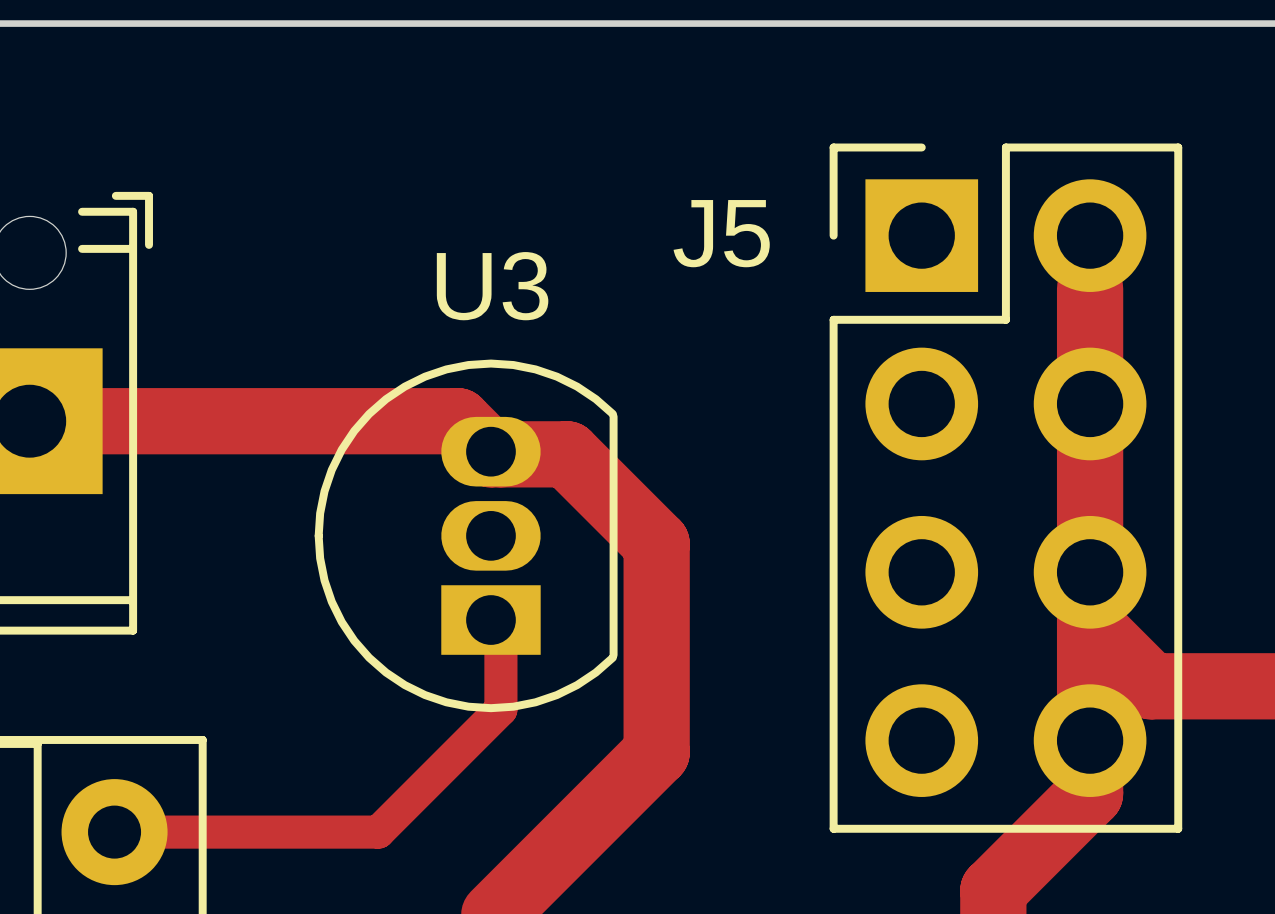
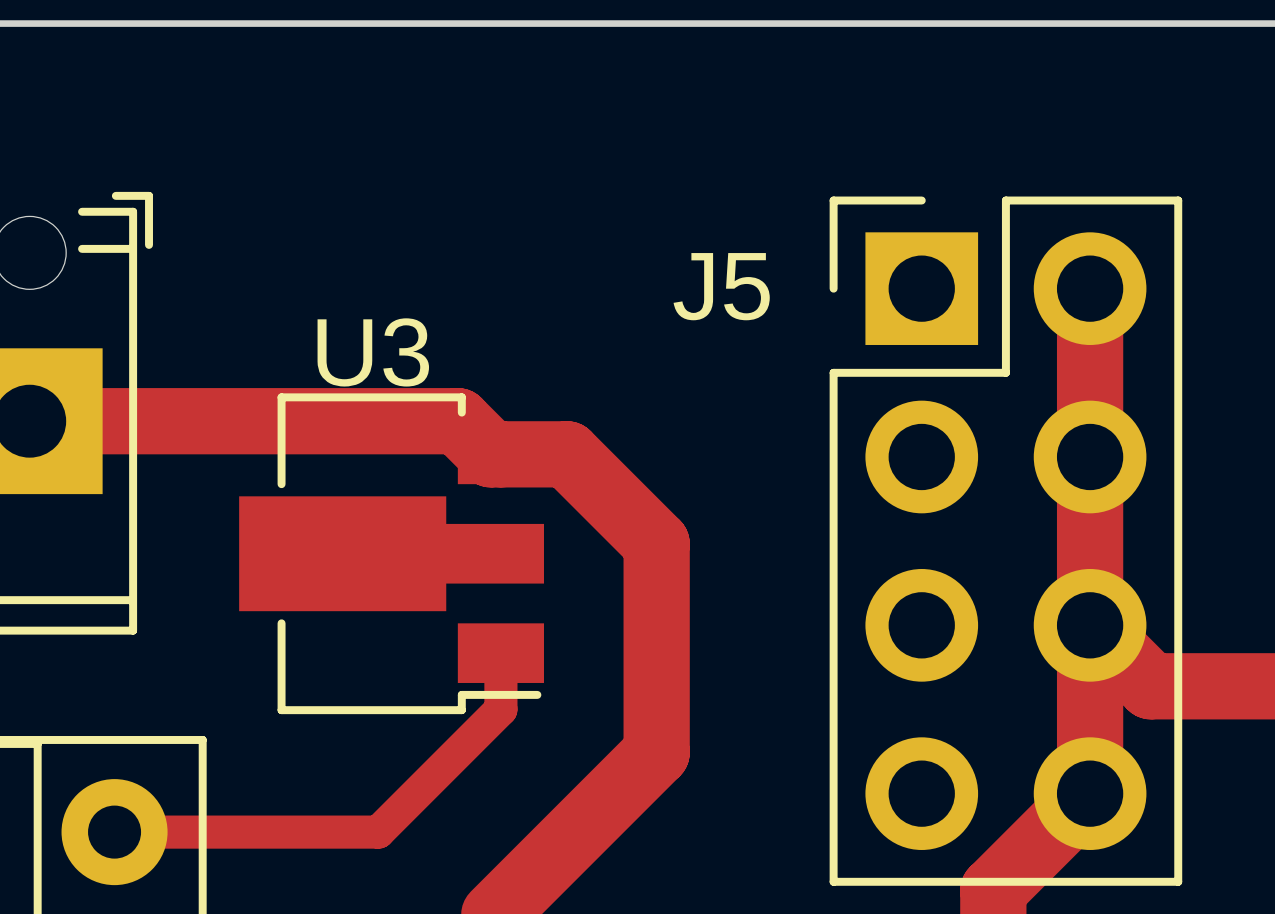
U3 footprint: [314, 359, 618, 713] -> [239, 393, 545, 715]
J5 position: (1005, 488) -> (1005, 541)

